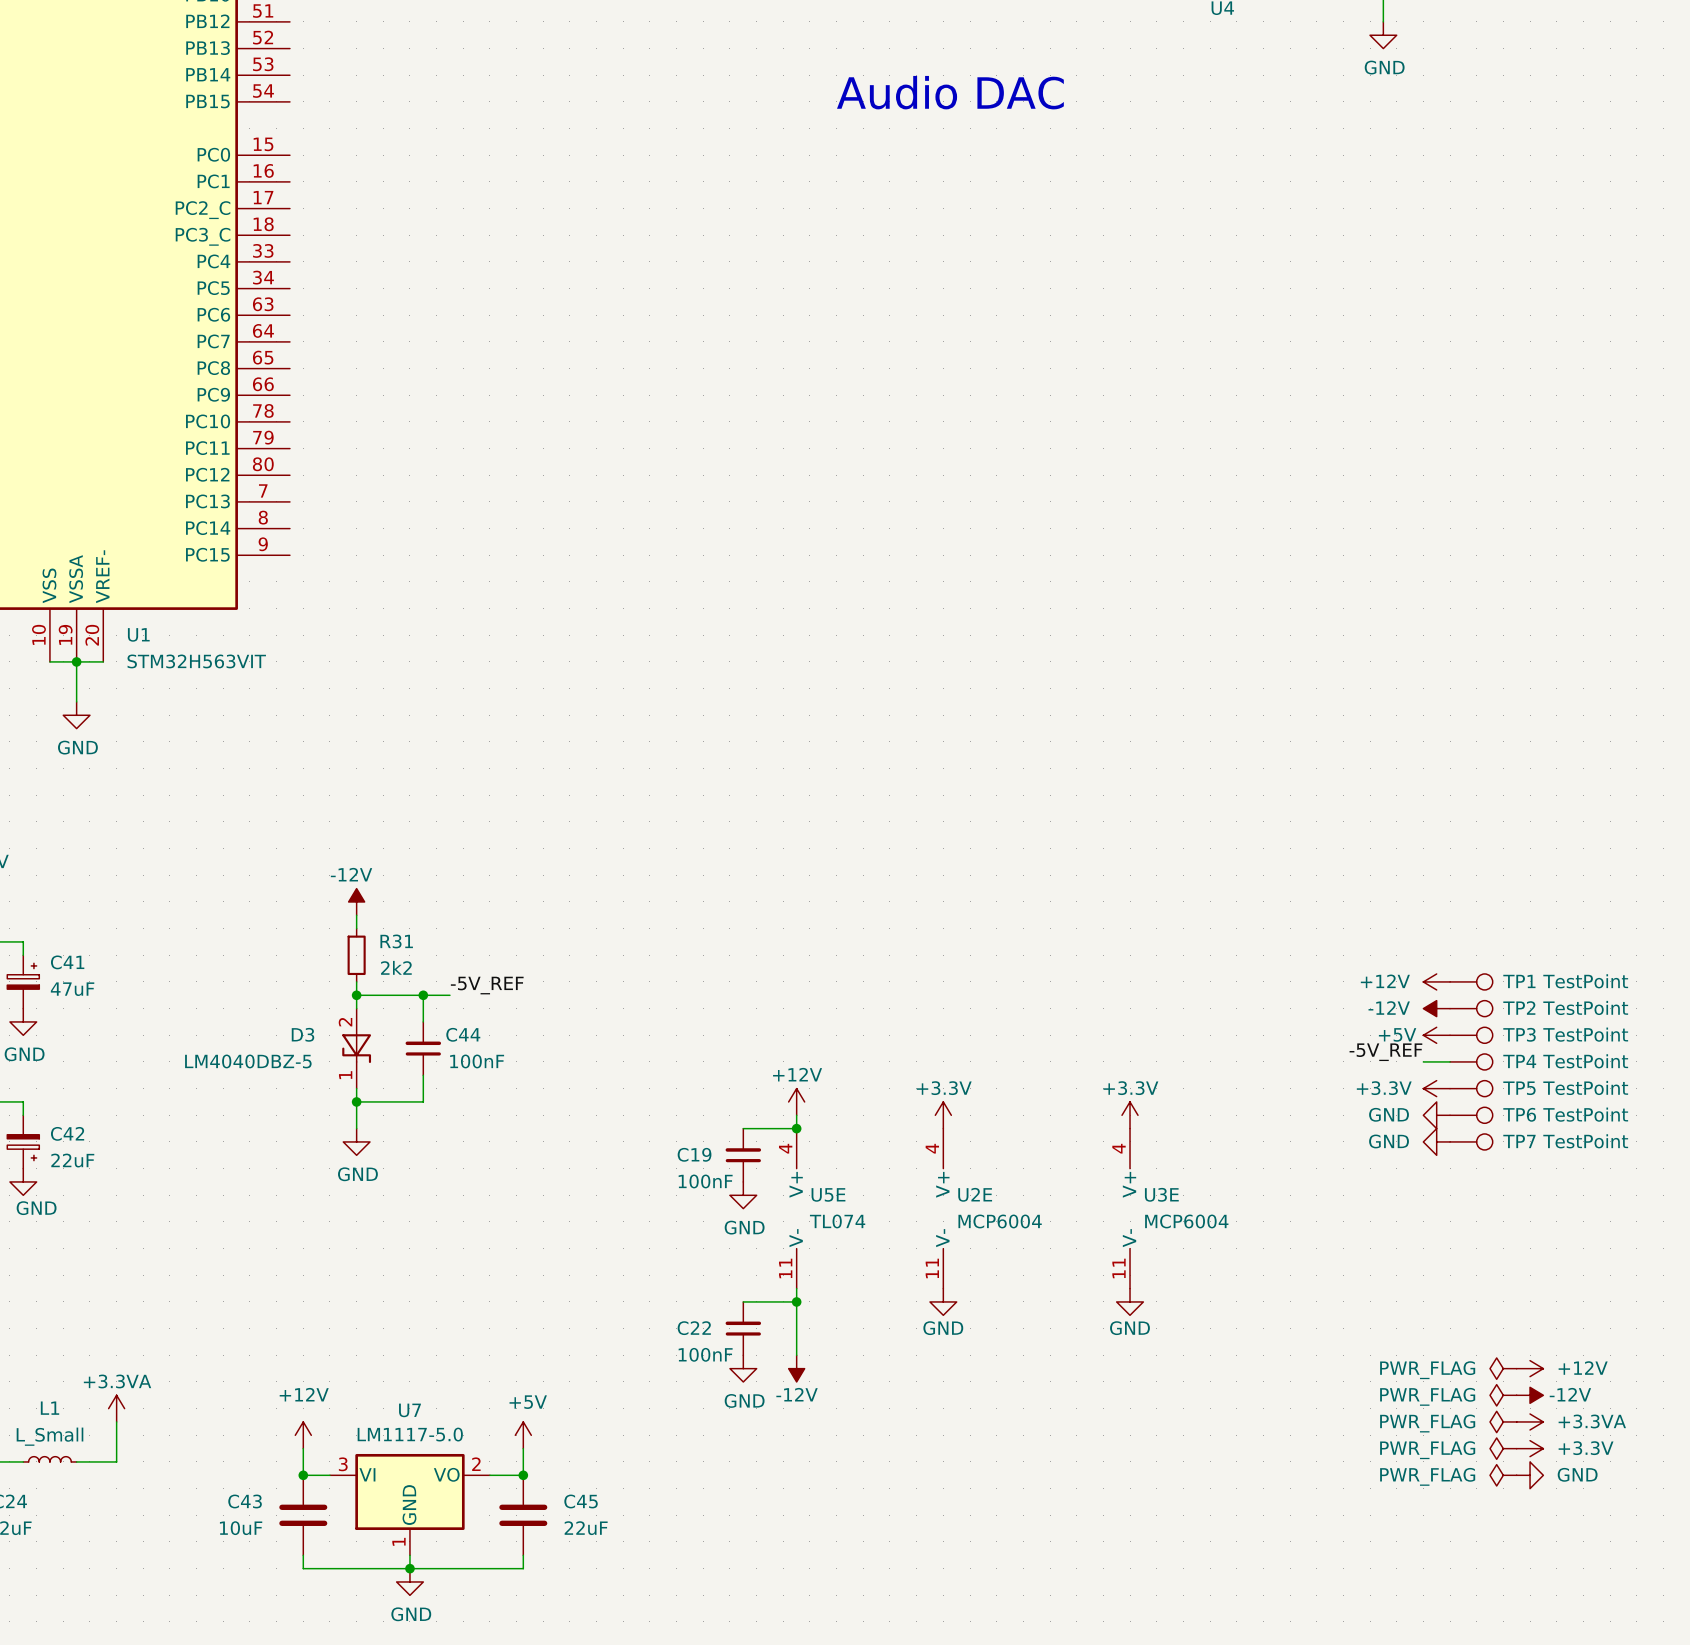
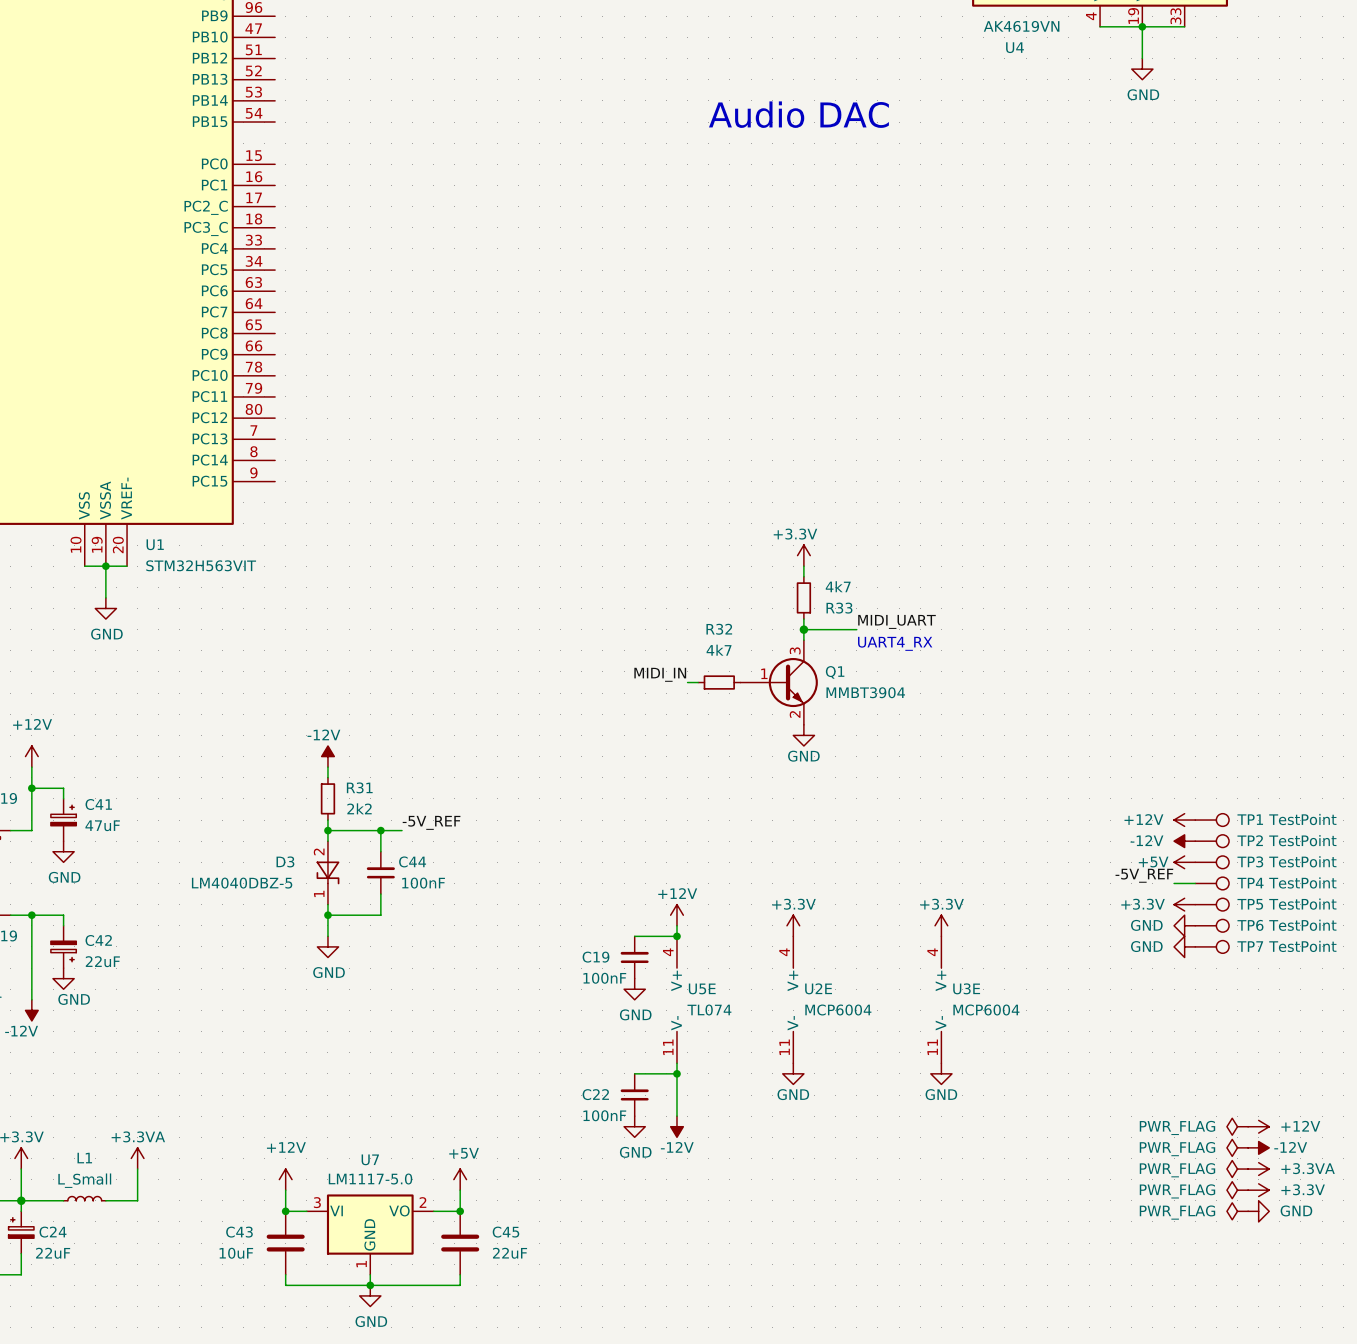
power symbol: none -> +3.3V (803, 555)
wire: none -> (803, 566) (803, 576)
R33: none -> 4k7 (803, 597)
wire: none -> (803, 619) (803, 640)
label: none -> MIDI_UART (897, 621)
wire: none -> (803, 629) (856, 629)
junction: none -> (803, 629)
text: none -> UART4_RX (895, 643)
label: none -> MIDI_IN (660, 674)
wire: none -> (687, 682) (698, 682)
R32: none -> 4k7 (719, 682)
Q1: none -> MMBT3904 (779, 682)
power symbol: none -> GND (803, 735)

